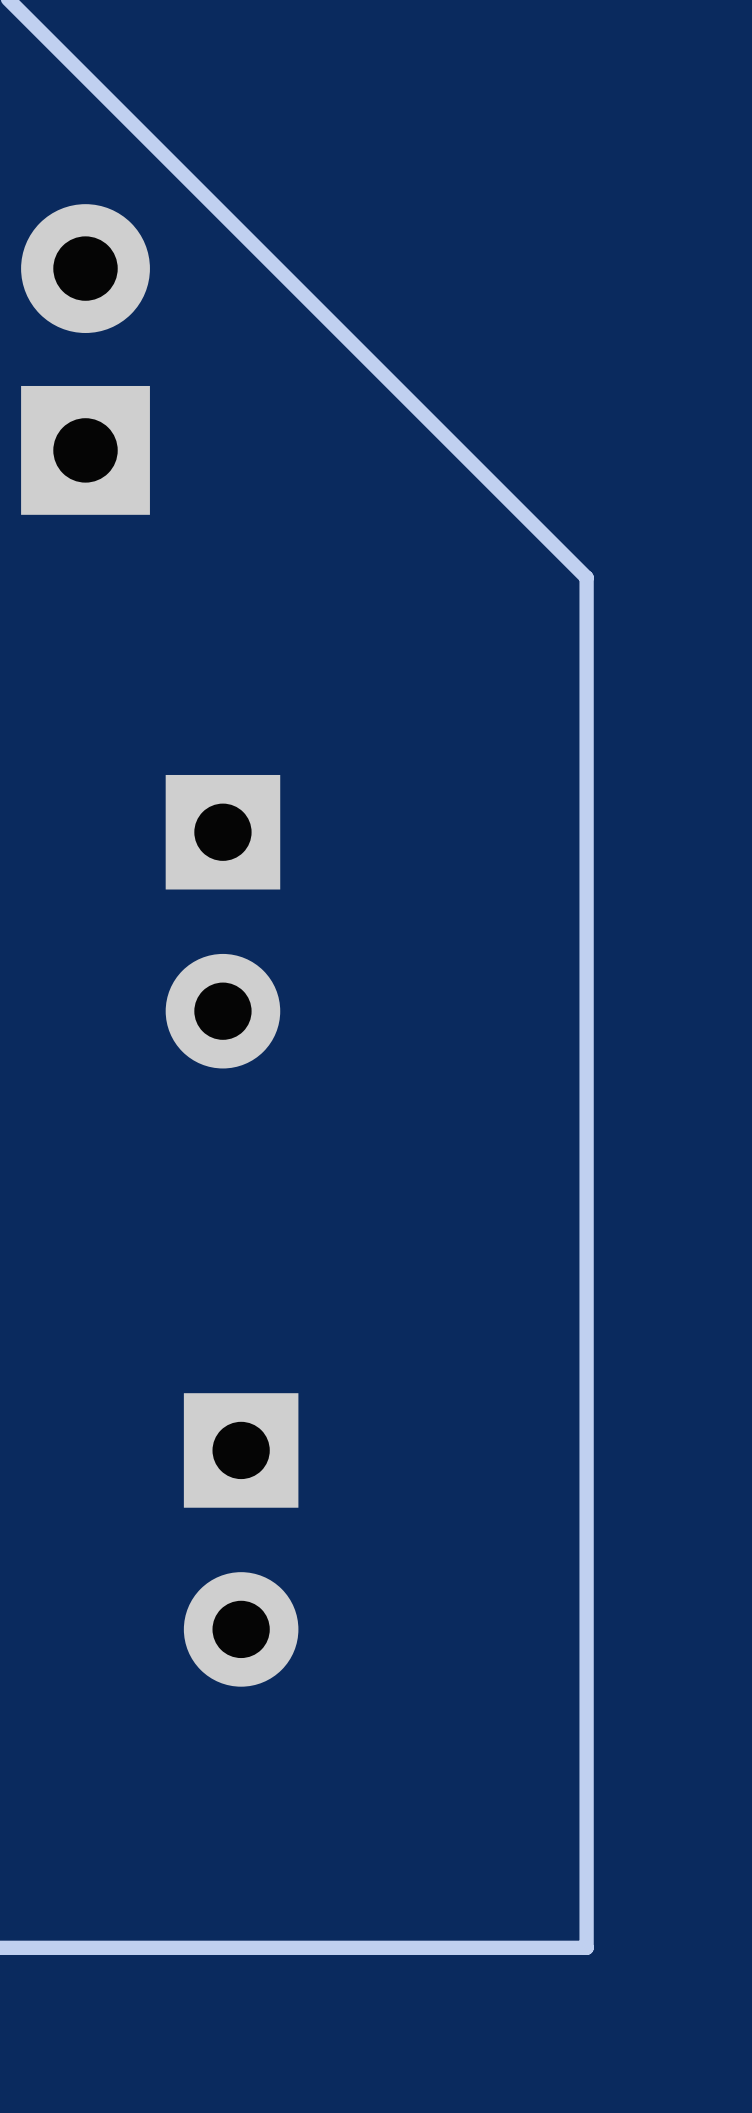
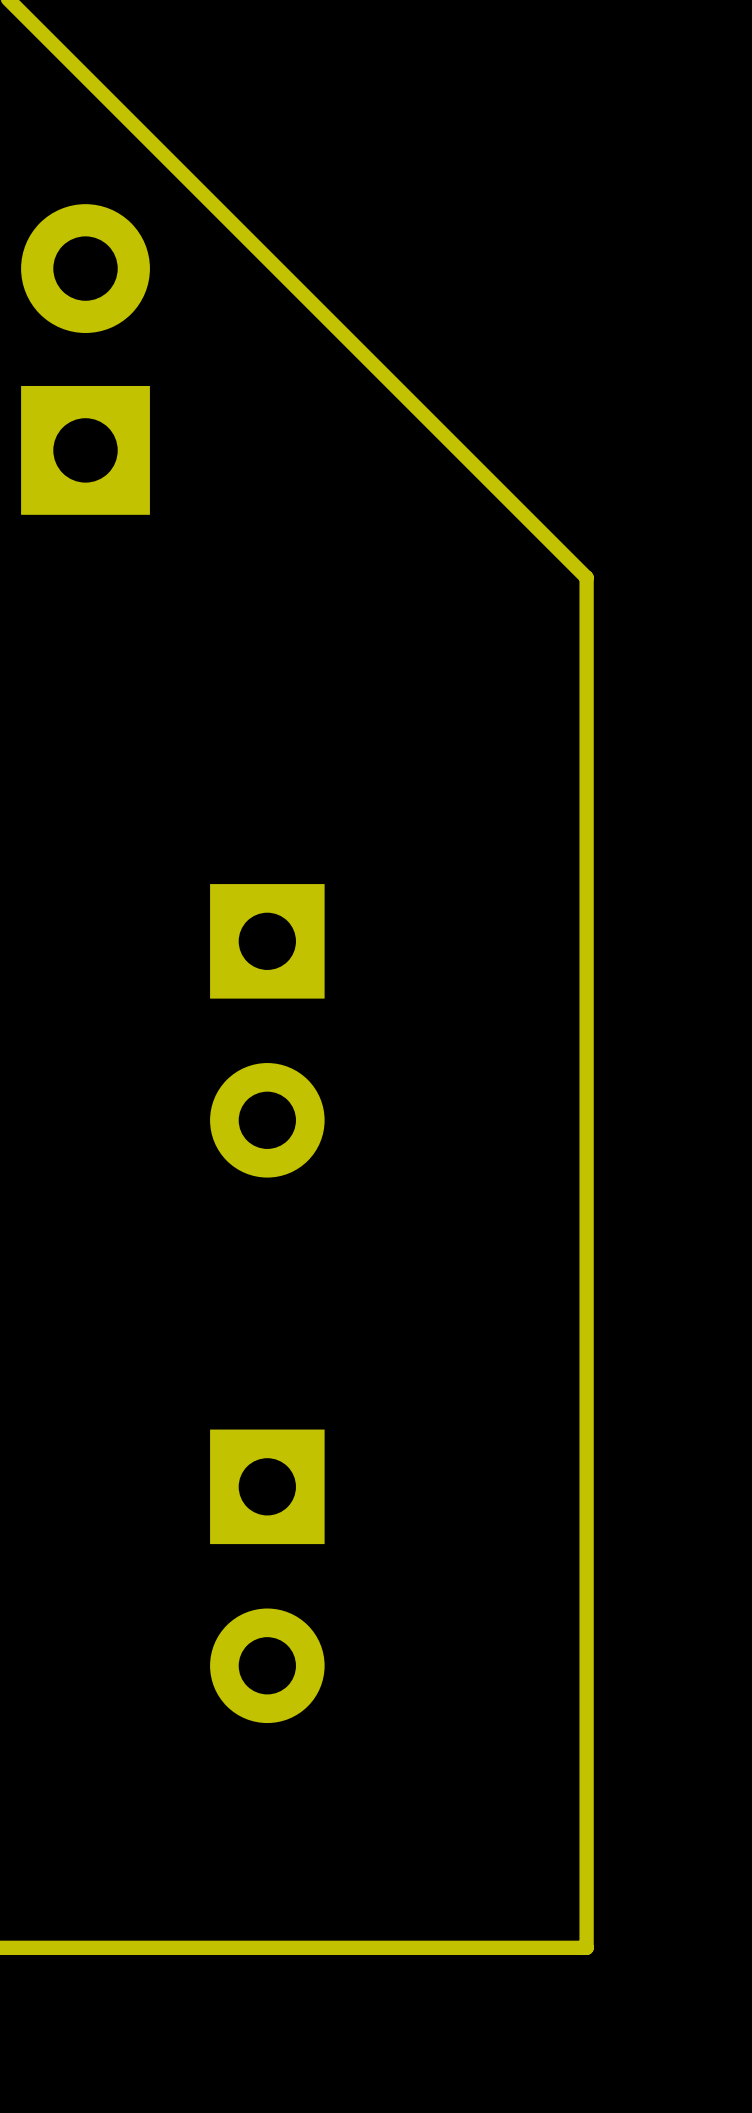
part position: (222, 921) -> (267, 1030)
part position: (241, 1539) -> (267, 1576)

